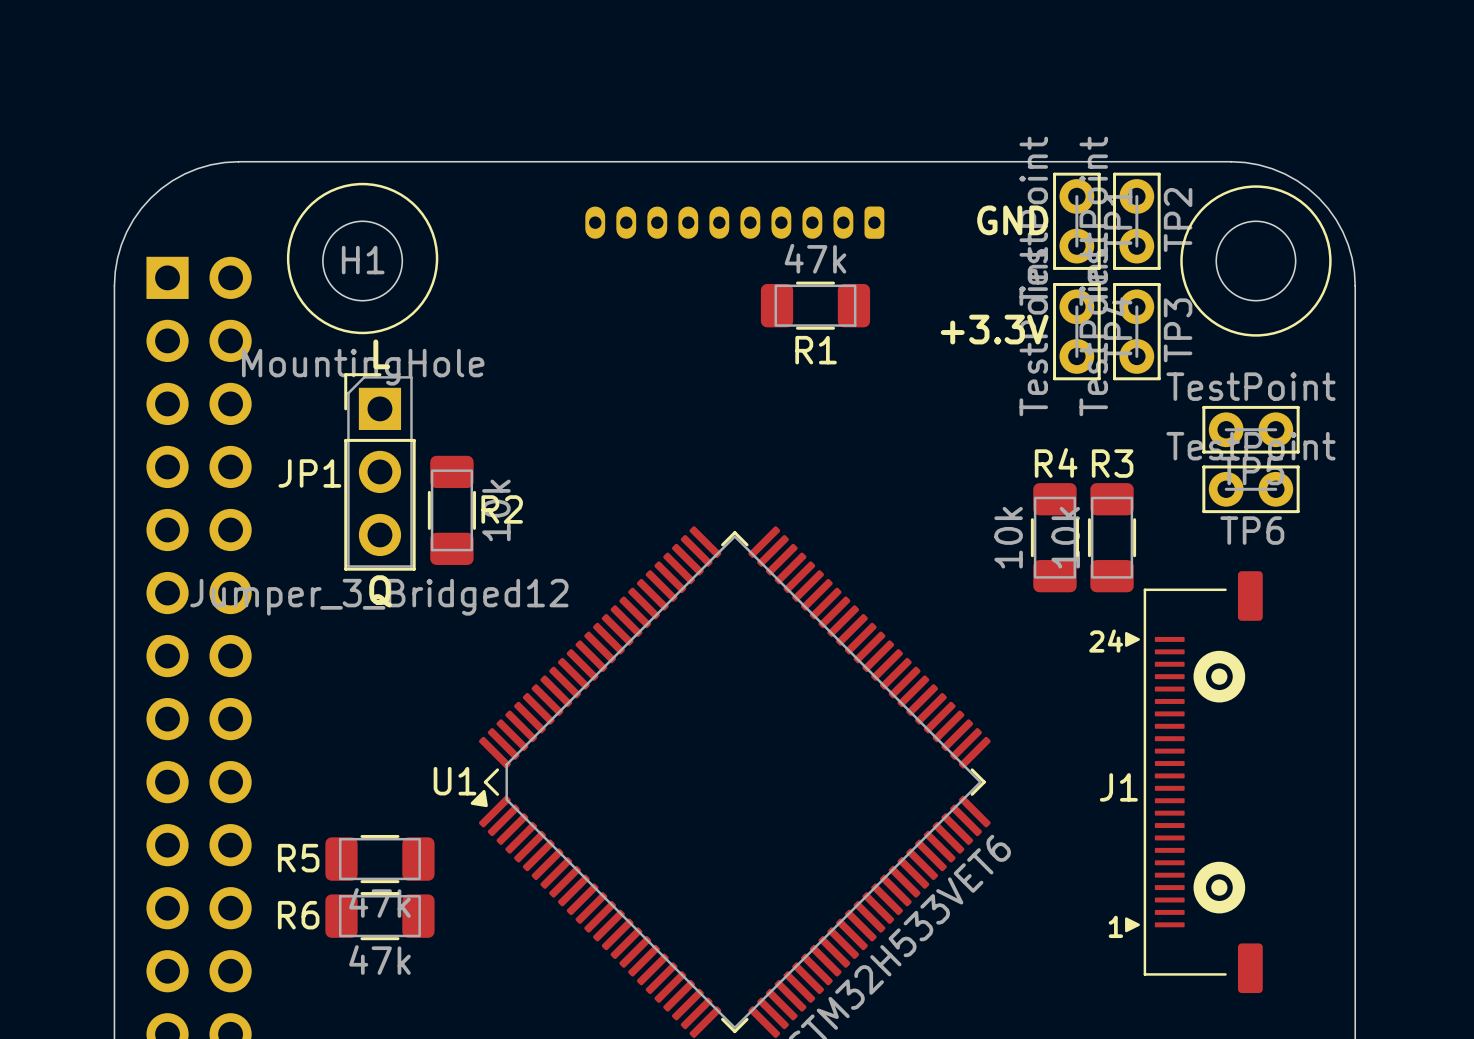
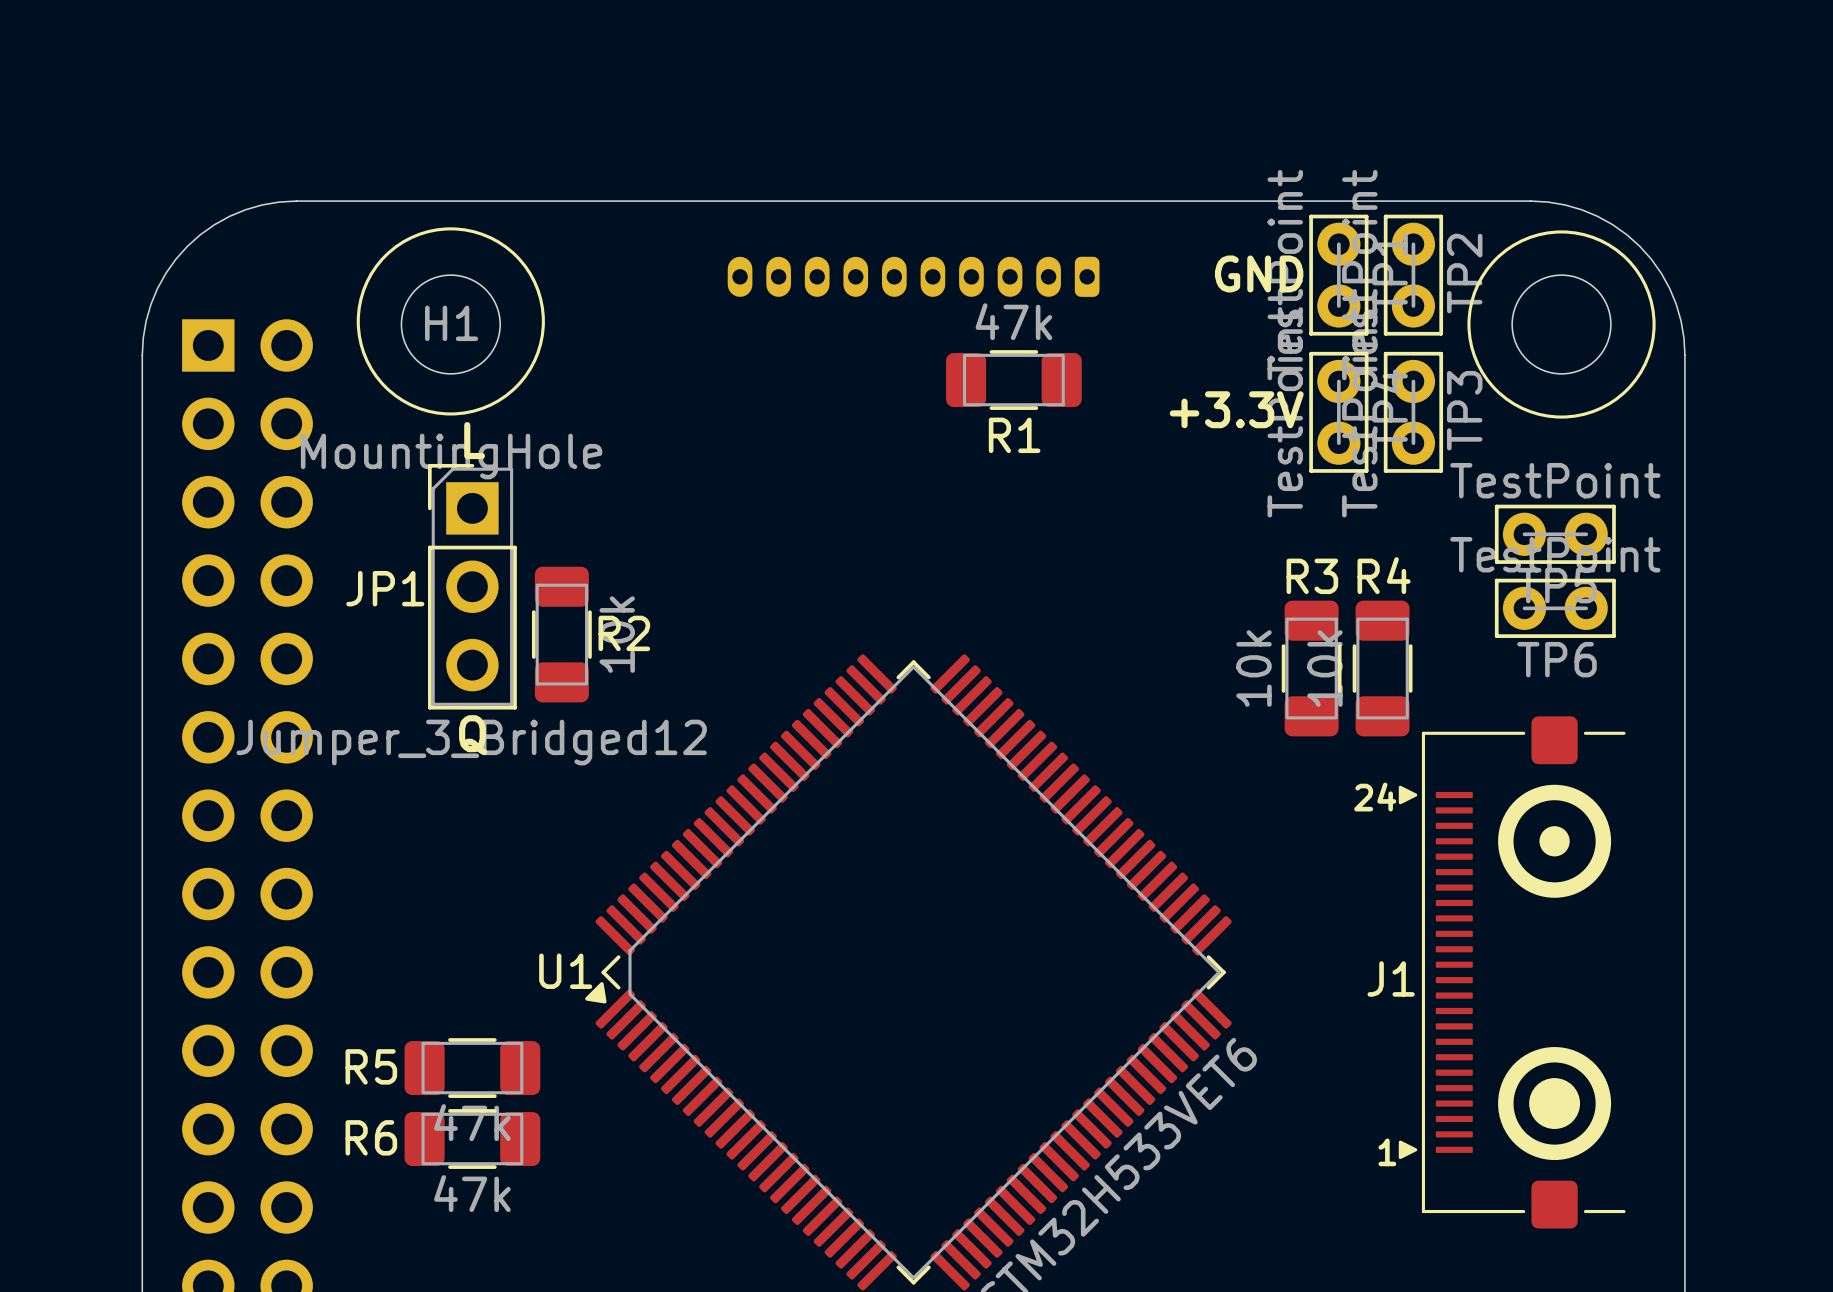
R4 name: R4 (1056, 462) -> R3 (1312, 576)
R3 name: R3 (1112, 463) -> R4 (1384, 575)
J1 footprint: [1125, 571, 1263, 994] -> [1398, 716, 1626, 1229]

